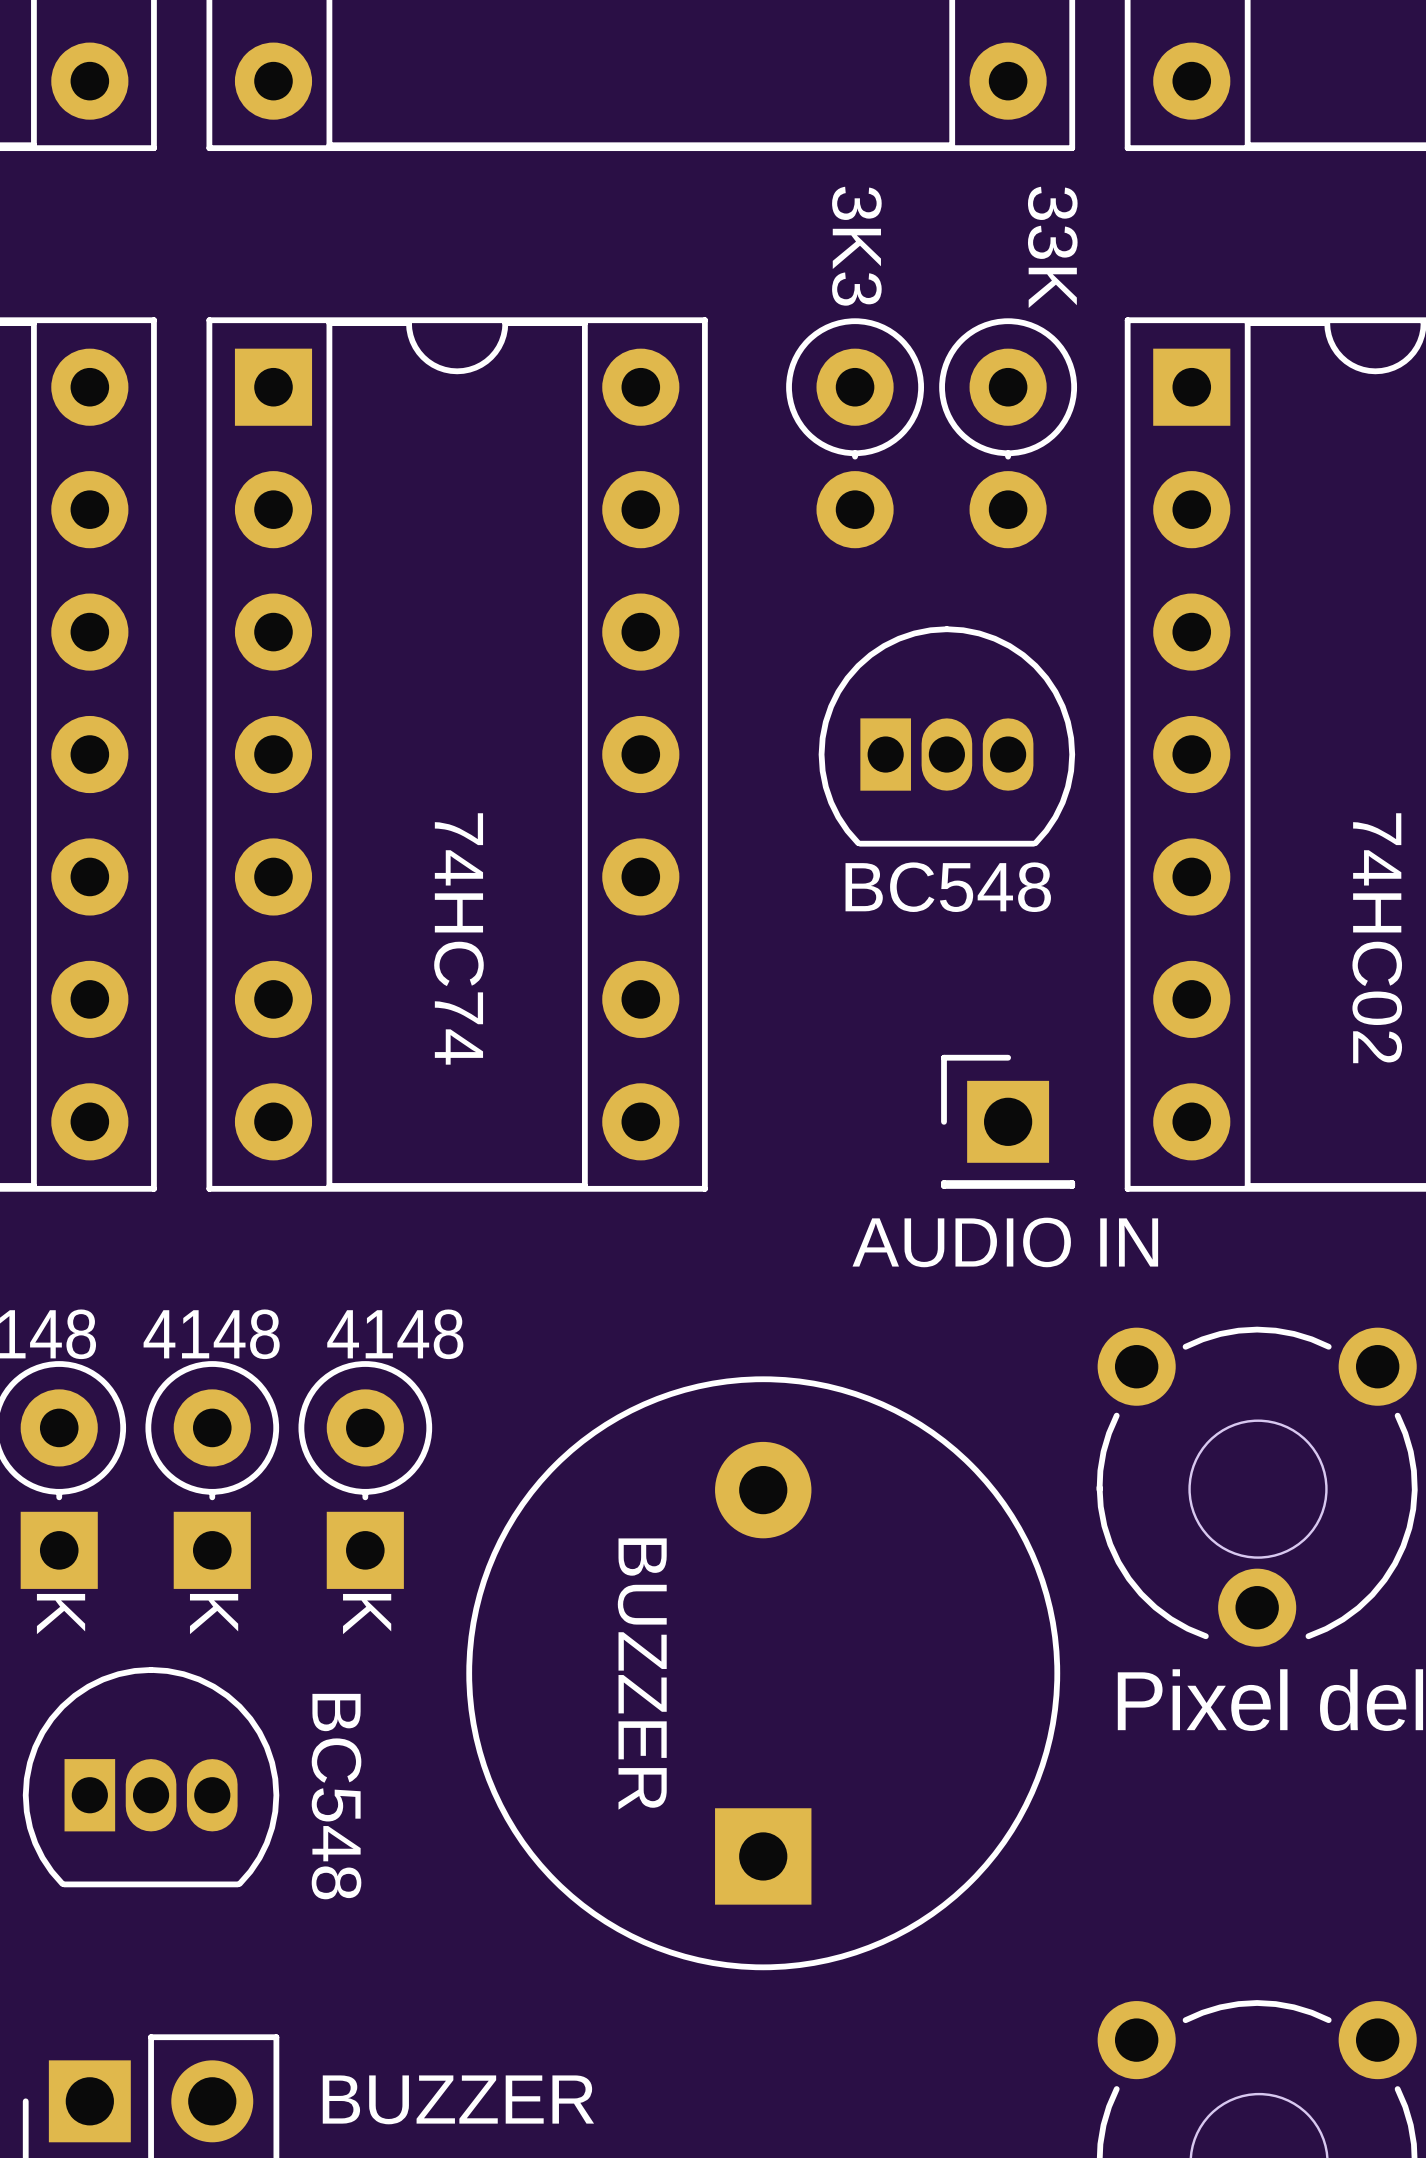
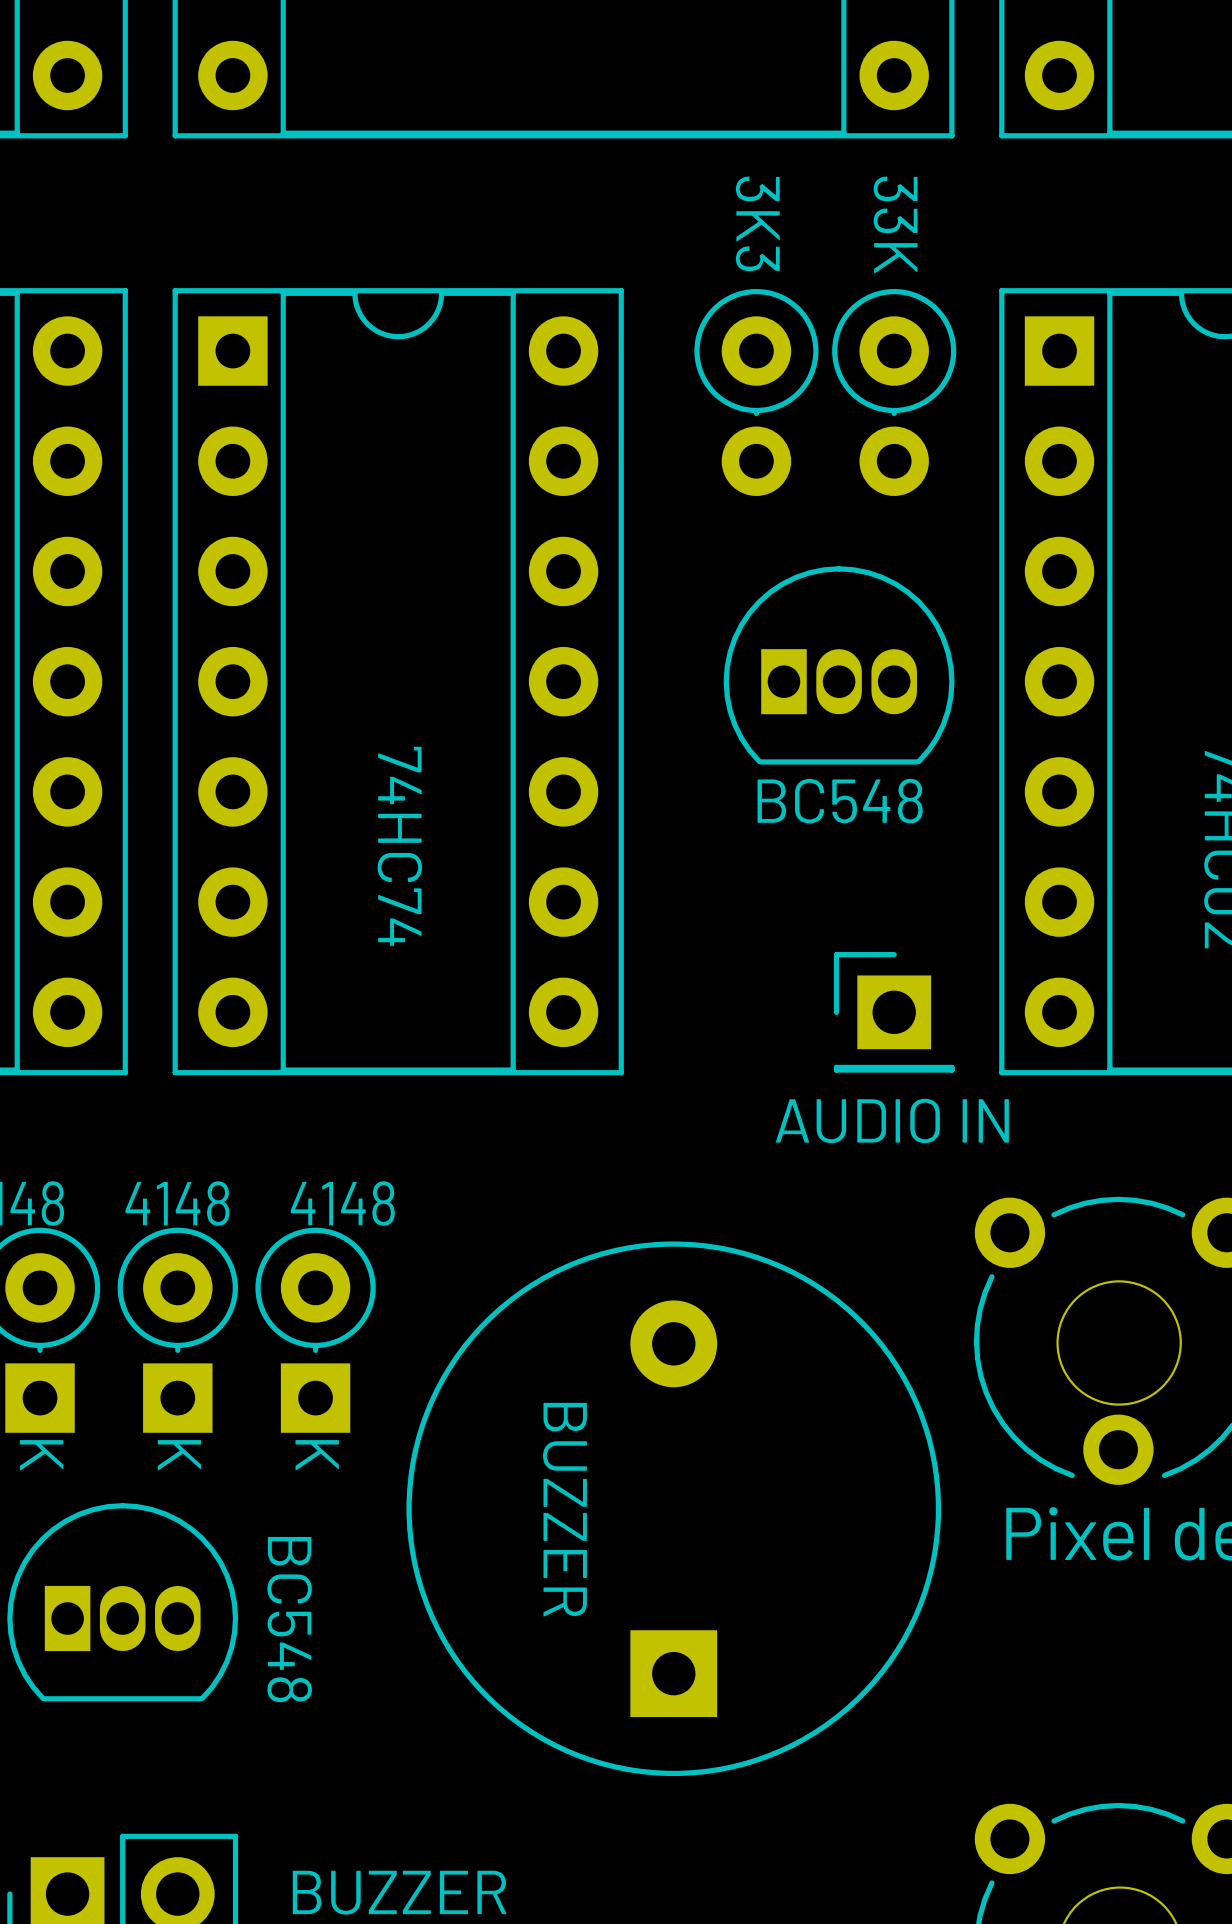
part value position: 33K (1052, 247) -> 33K (895, 225)

